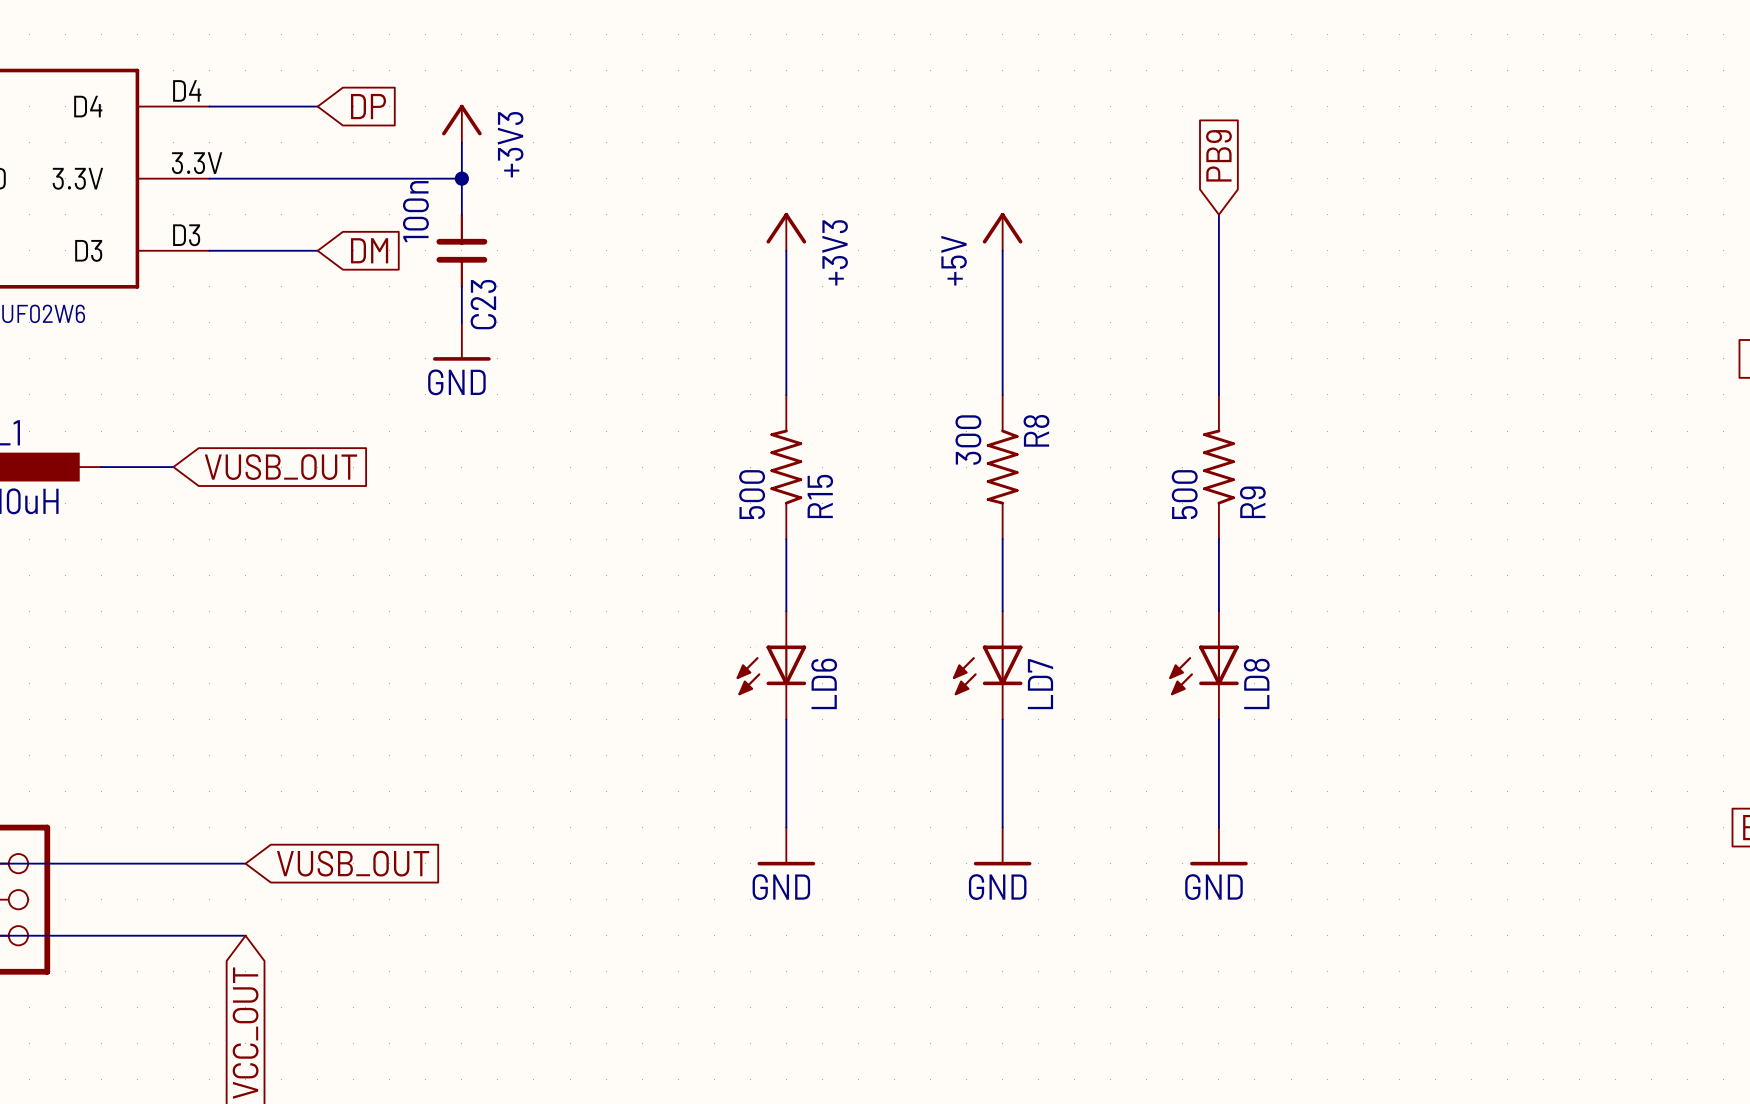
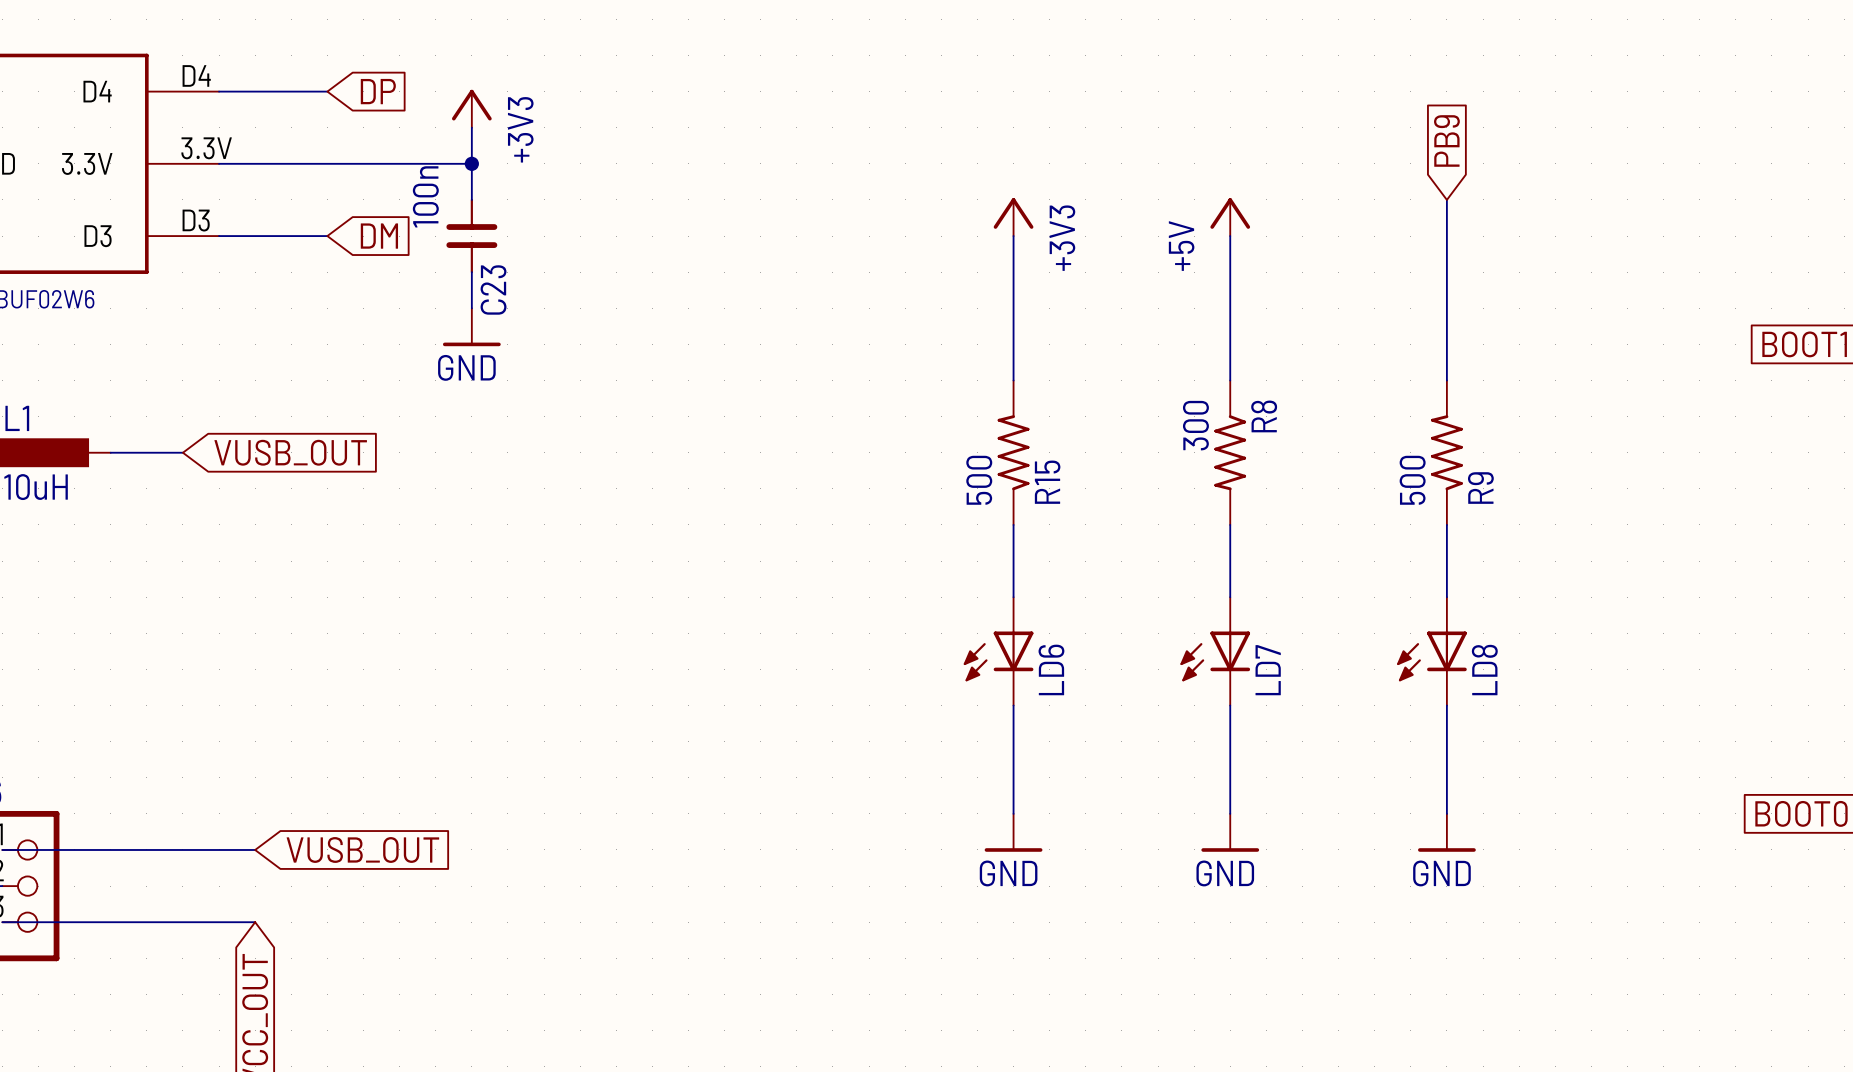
global label position: PB9 (1218, 155) -> PB9 (1446, 140)
wire: none -> (1446, 199) (1446, 380)
power symbol: +3V3 (786, 231) -> none
power symbol: +5V (1002, 231) -> +3V3 (1013, 217)
power symbol: none -> +5V (1230, 217)
wire: (786, 250) (786, 394) -> none
R15 position: (786, 467) -> (1013, 452)
R8 position: (1002, 467) -> (1230, 452)
R9 position: (1218, 467) -> (1446, 452)
wire: (786, 539) (786, 611) -> none
wire: none -> (1446, 524) (1446, 597)
LD6: (771, 665) -> none
LD8: none -> (1431, 651)
LD8 name: LD8 (1256, 683) -> LD7 (1268, 670)
LD7 name: LD7 (1040, 684) -> LD6 (1051, 669)
wire: (786, 719) (786, 827) -> none
wire: none -> (1446, 705) (1446, 813)
power symbol: GND (786, 846) -> none
power symbol: none -> GND (1446, 832)

